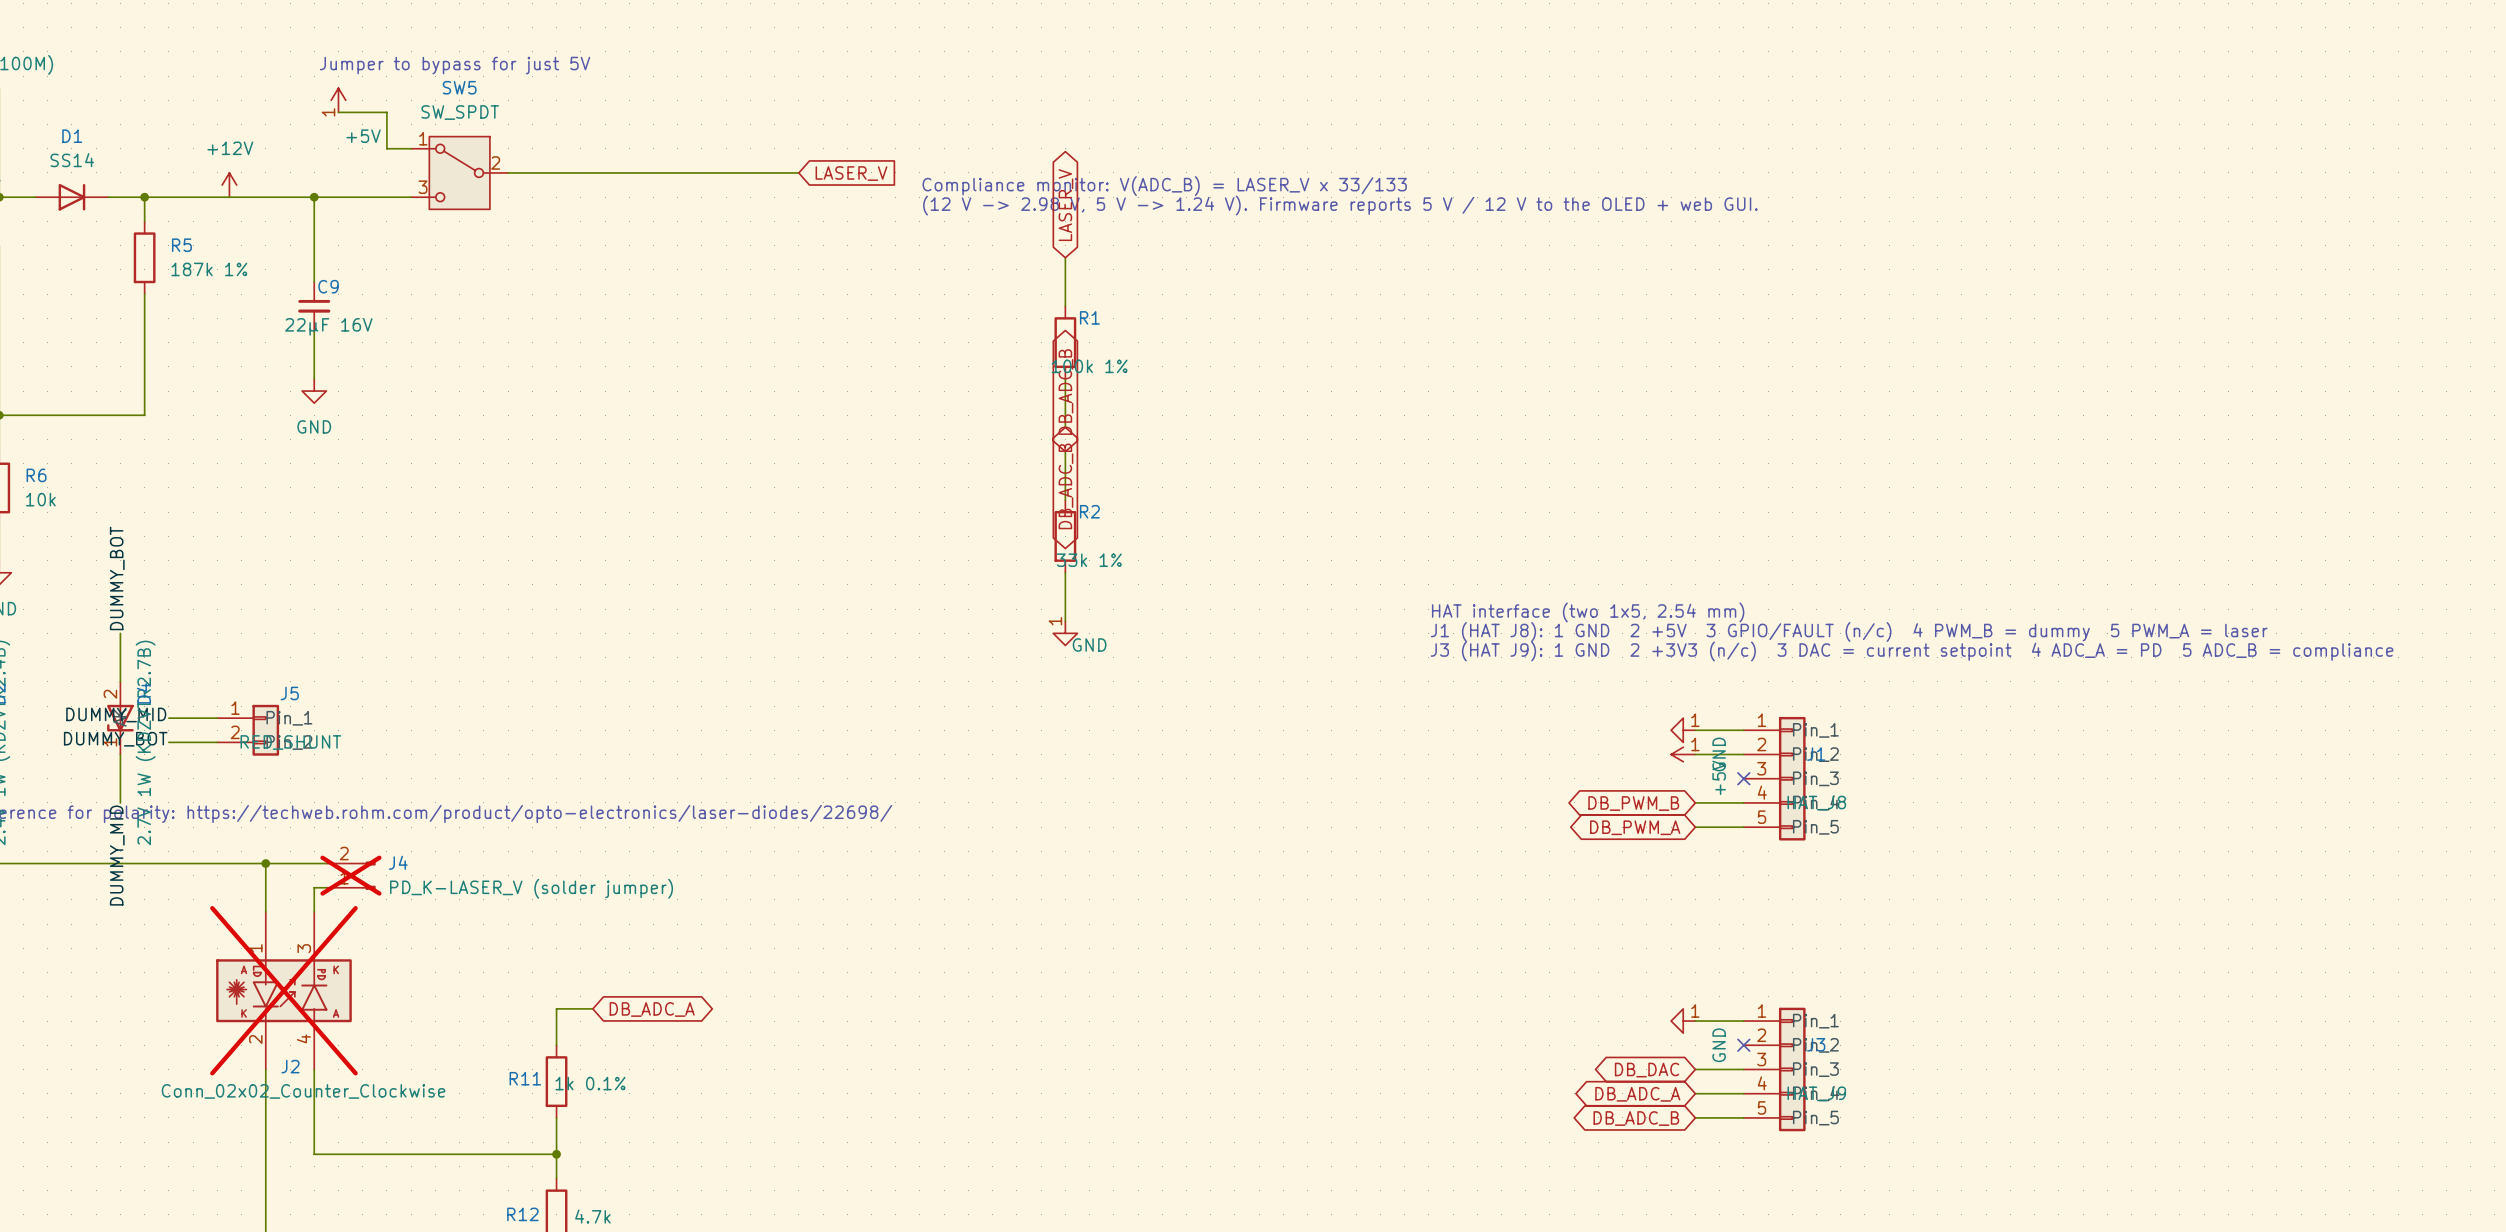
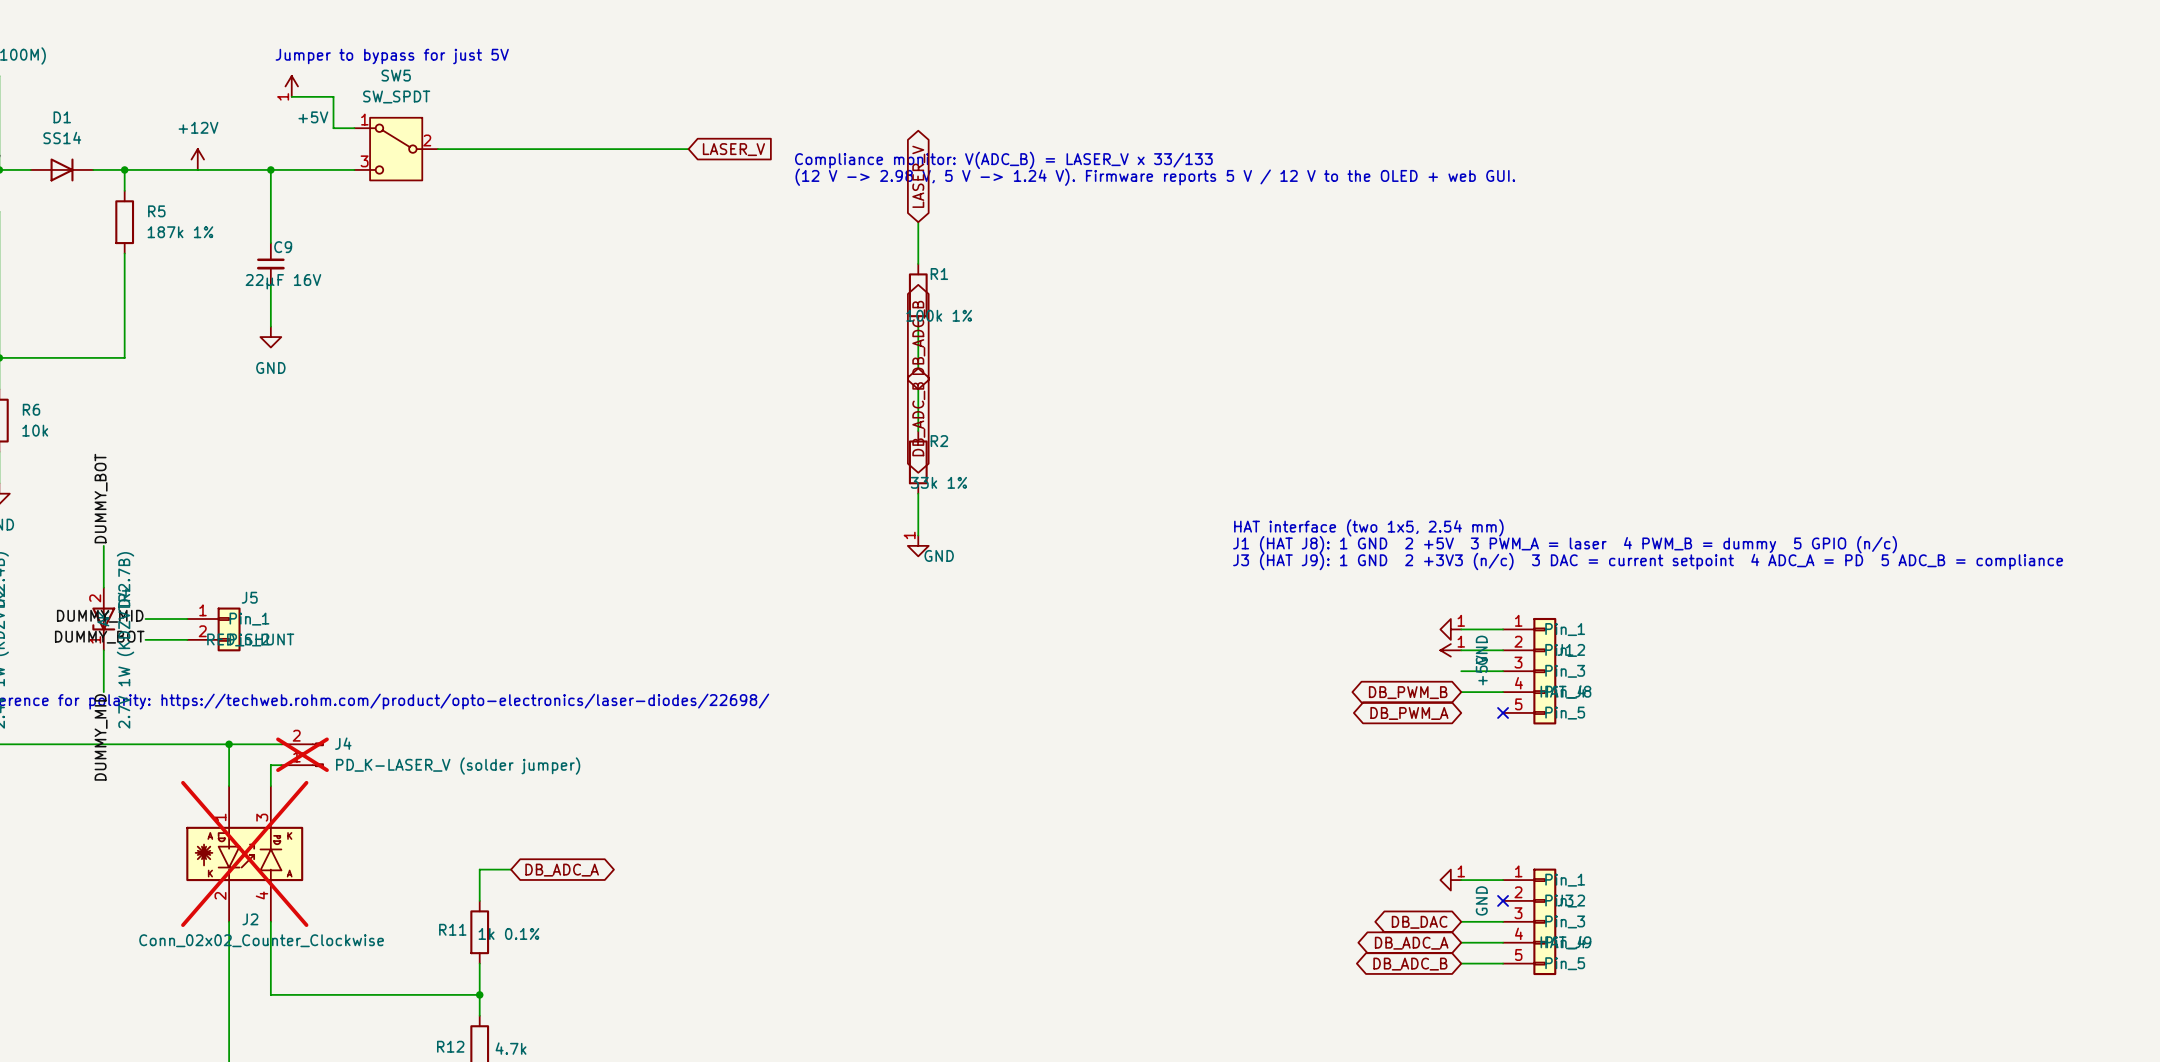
text: J1 (HAT J8): 1 GND 2 +5V 3 GPIO/FAULT (n/c) 4 PWM_B = dummy 5 PWM_A = laser (1849, 631) -> J1 (HAT J8): 1 GND 2 +5V 3 PWM_A = laser 4 PWM_B = dummy 5 GPIO (n/c) (1565, 544)
no-connect mark position: (1743, 778) -> (1503, 712)
wire: (1695, 827) (1743, 827) -> (1461, 671) (1503, 671)

